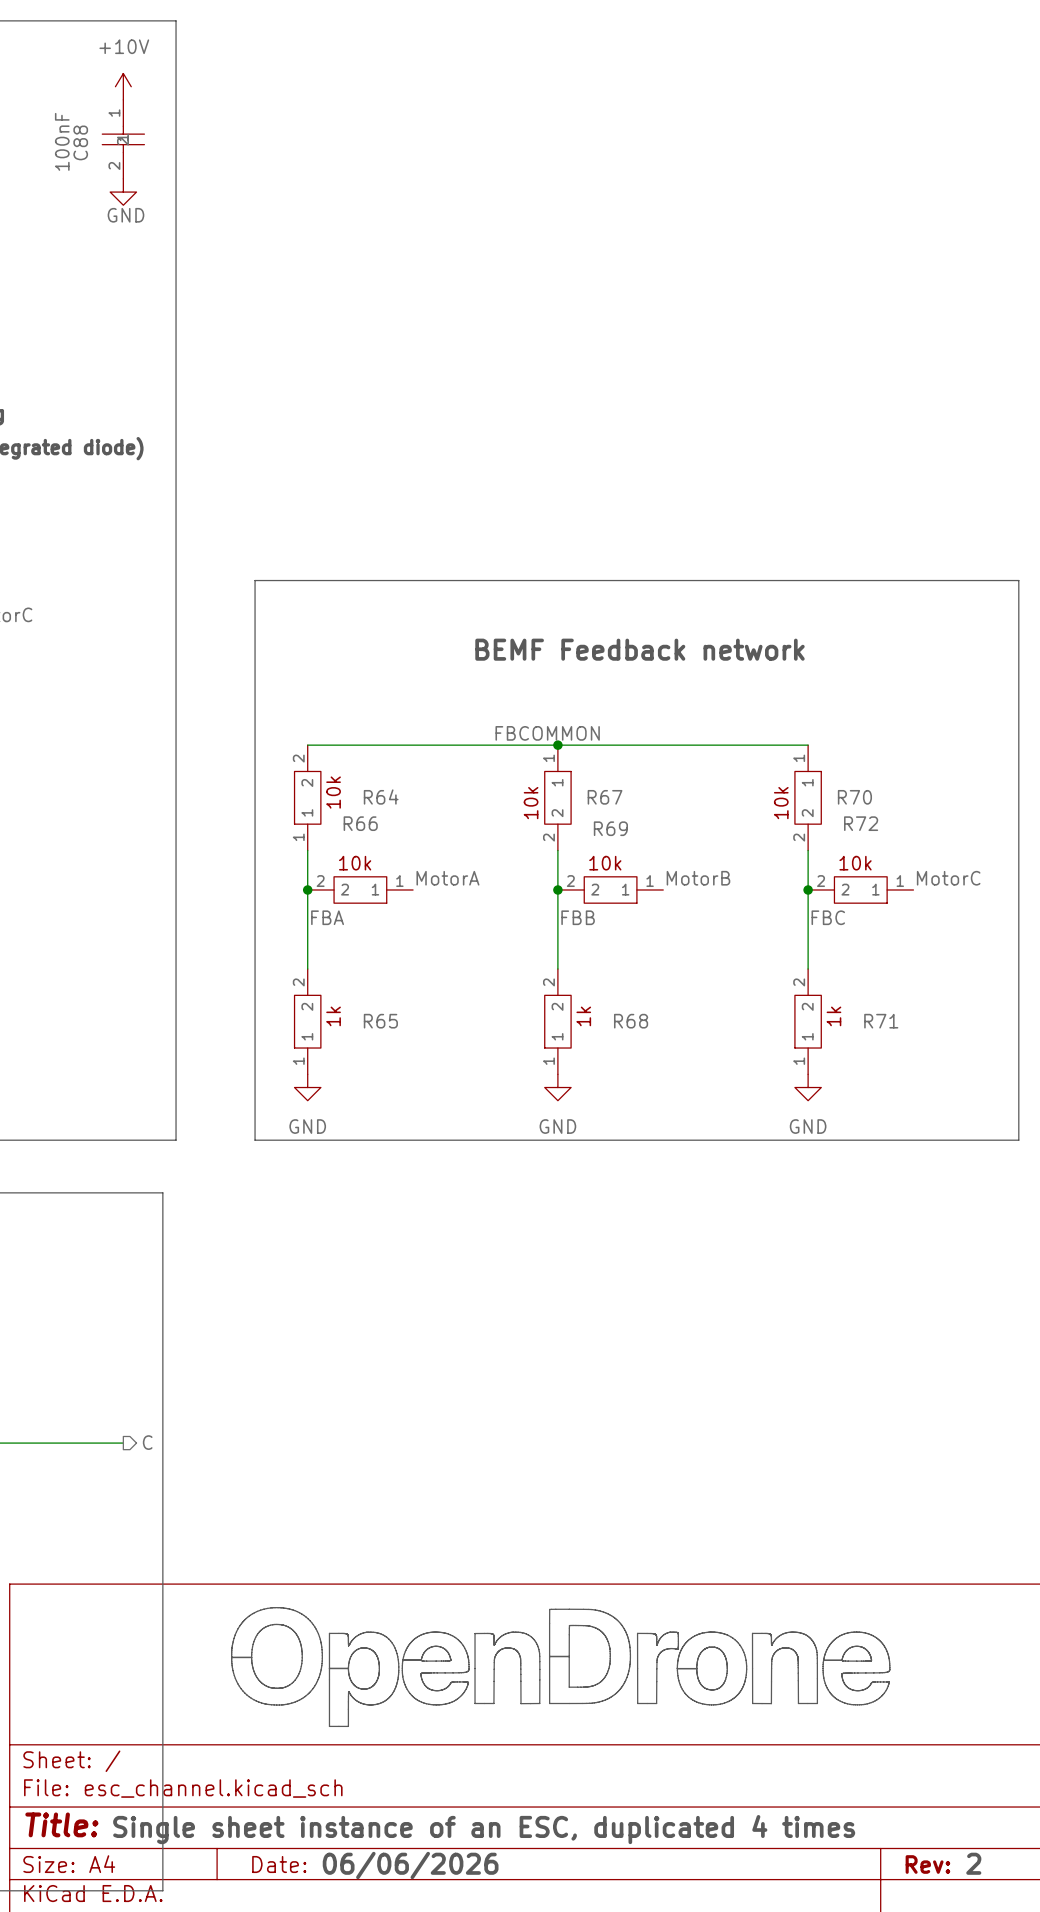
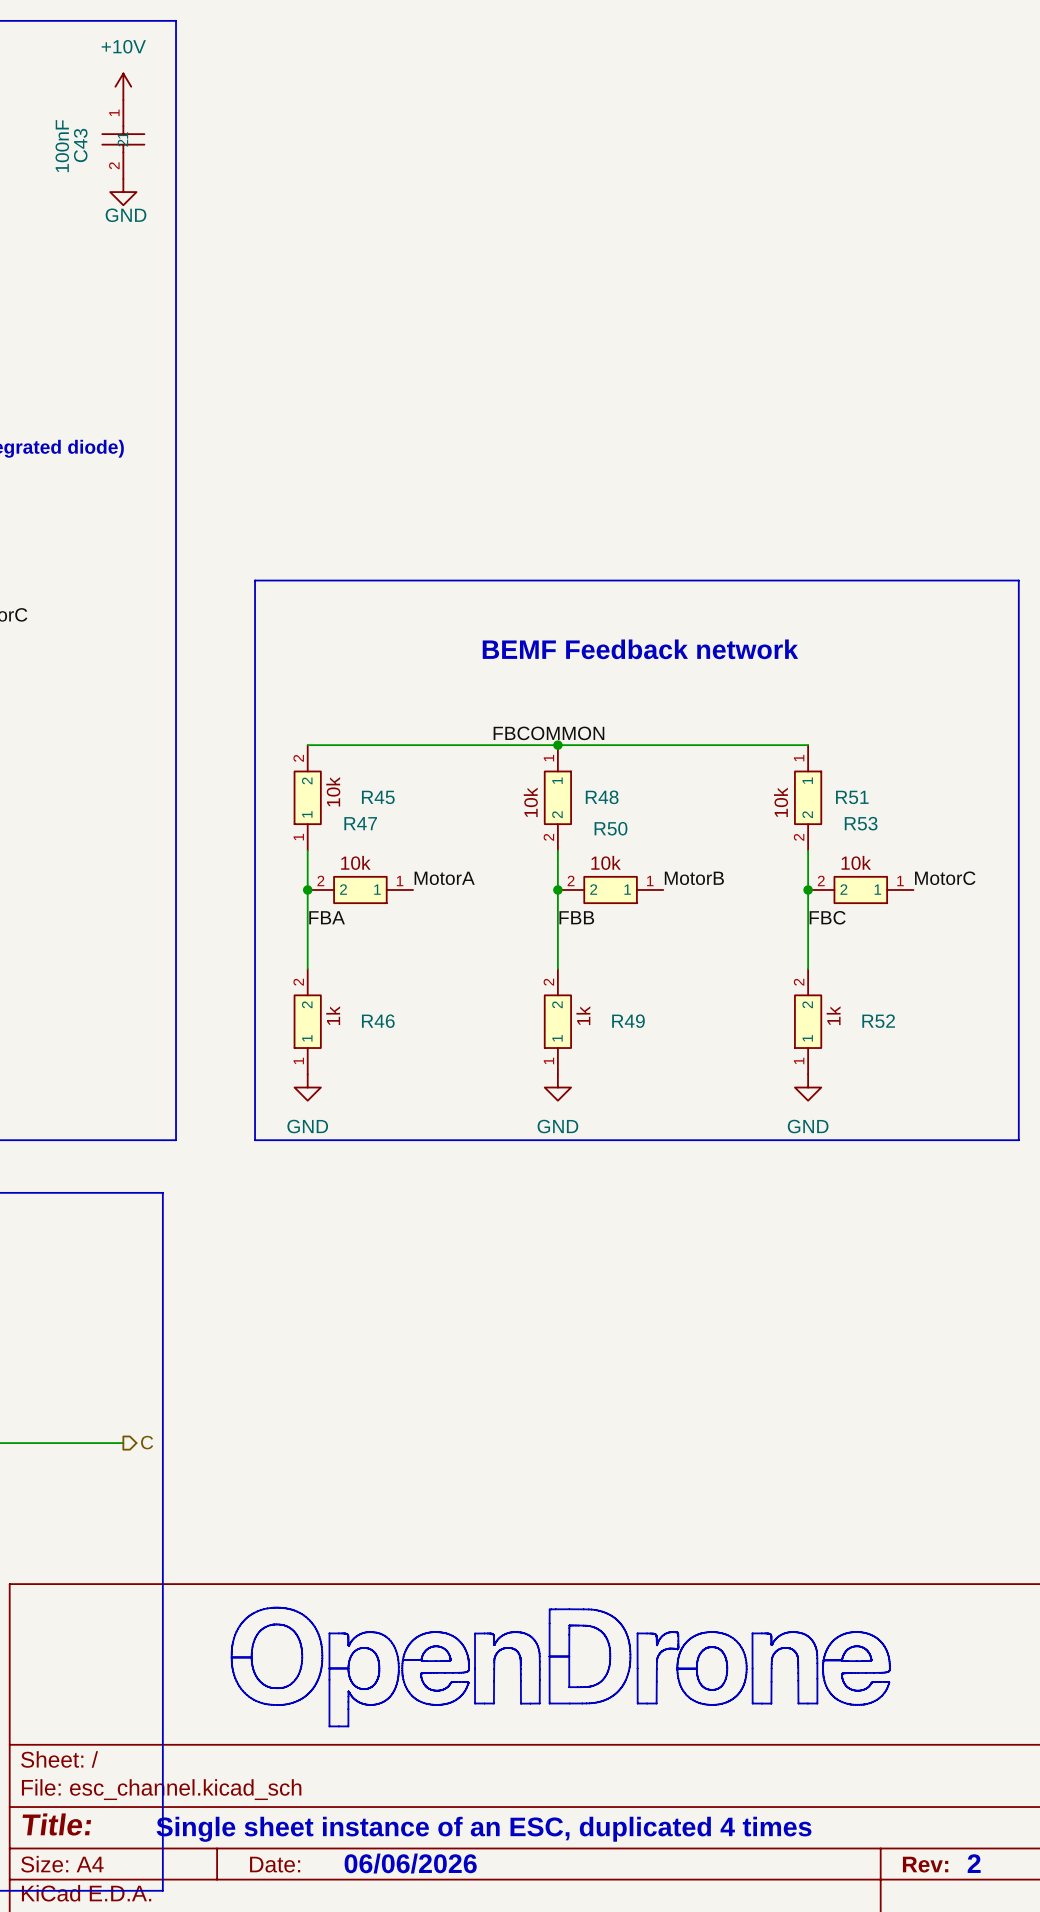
C88 name: C88 (80, 142) -> C43 (80, 145)
R64 name: R64 (381, 797) -> R45 (378, 797)
R67 name: R67 (605, 797) -> R48 (602, 797)
R70 name: R70 (854, 797) -> R51 (852, 797)
R66 name: R66 (360, 823) -> R47 (360, 823)
R72 name: R72 (861, 823) -> R53 (861, 823)
R69 name: R69 (610, 828) -> R50 (610, 828)
R65 name: R65 (380, 1021) -> R46 (378, 1021)
R68 name: R68 (631, 1021) -> R49 (628, 1021)
R71 name: R71 (881, 1021) -> R52 (878, 1021)

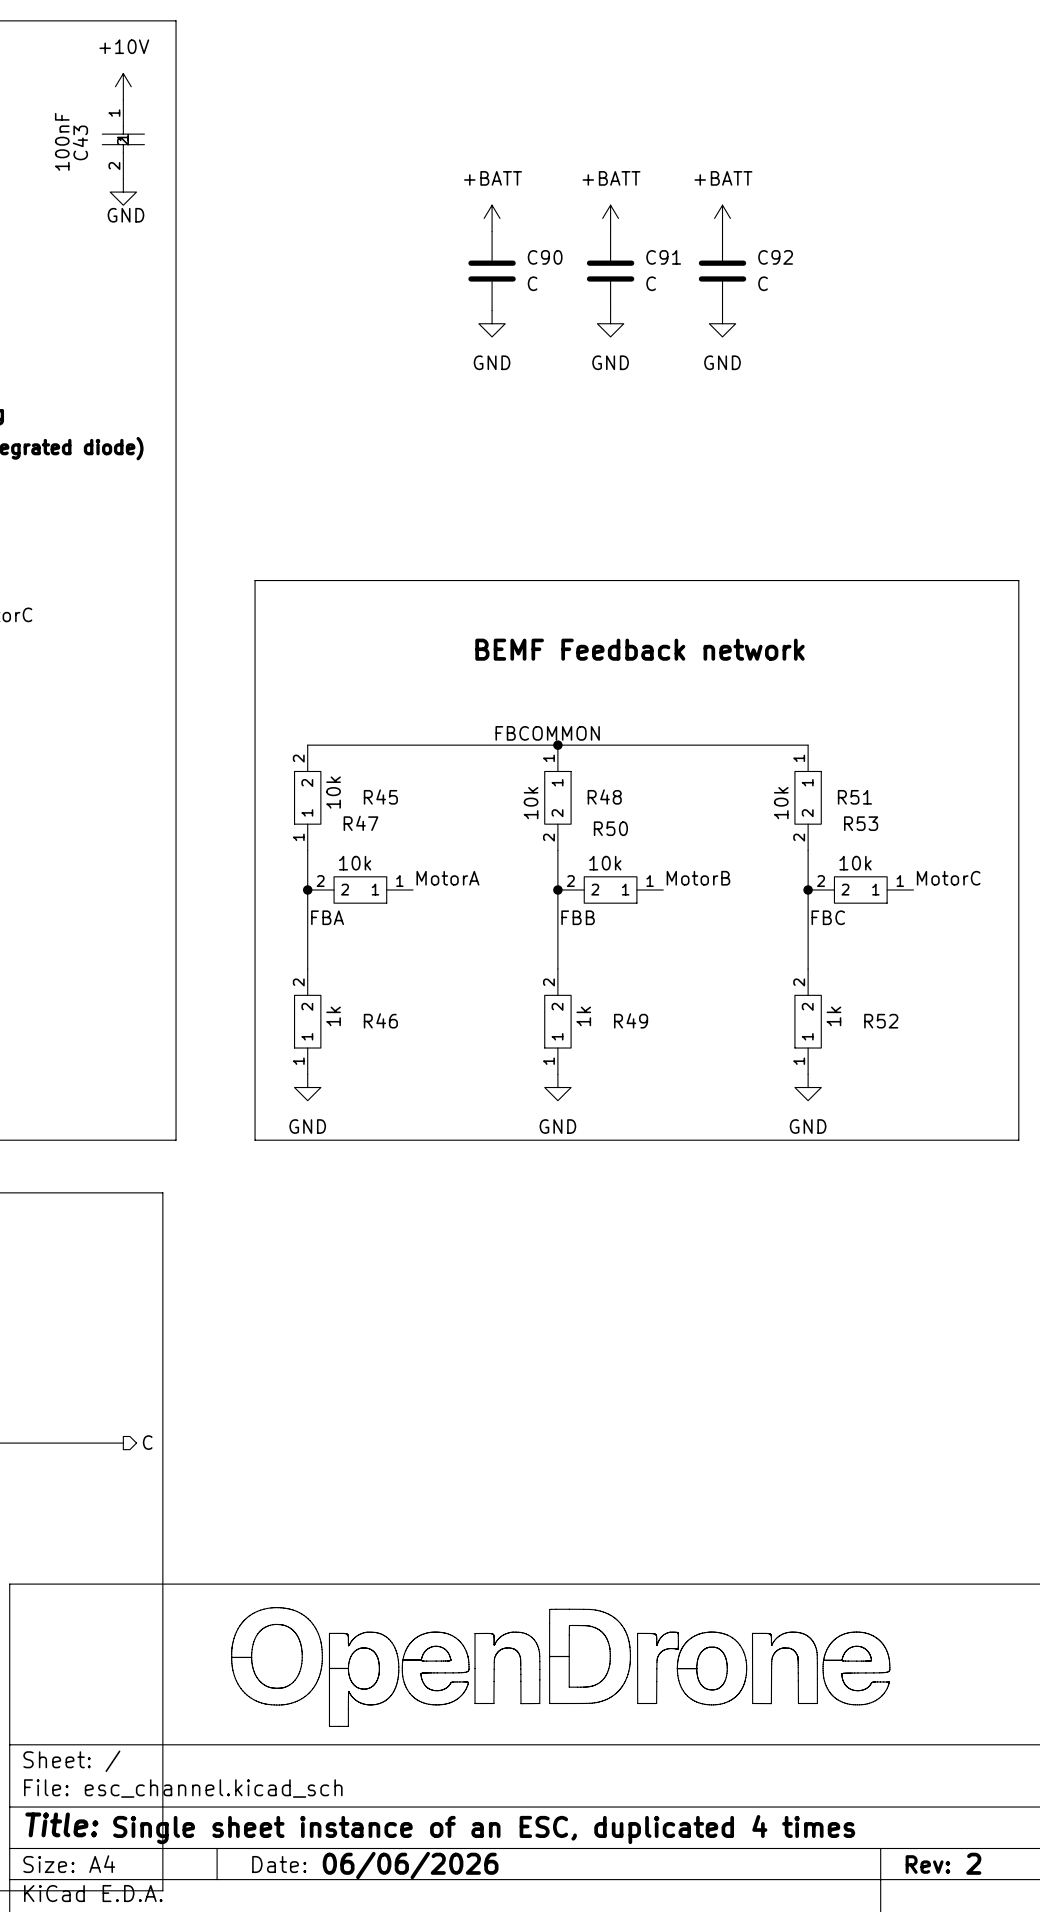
power symbol: none -> +BATT (492, 218)
power symbol: none -> +BATT (610, 218)
power symbol: none -> +BATT (722, 218)
C90: none -> C (492, 271)
C91: none -> C (610, 271)
C92: none -> C (722, 271)
power symbol: none -> GND (492, 323)
power symbol: none -> GND (610, 323)
power symbol: none -> GND (722, 323)

